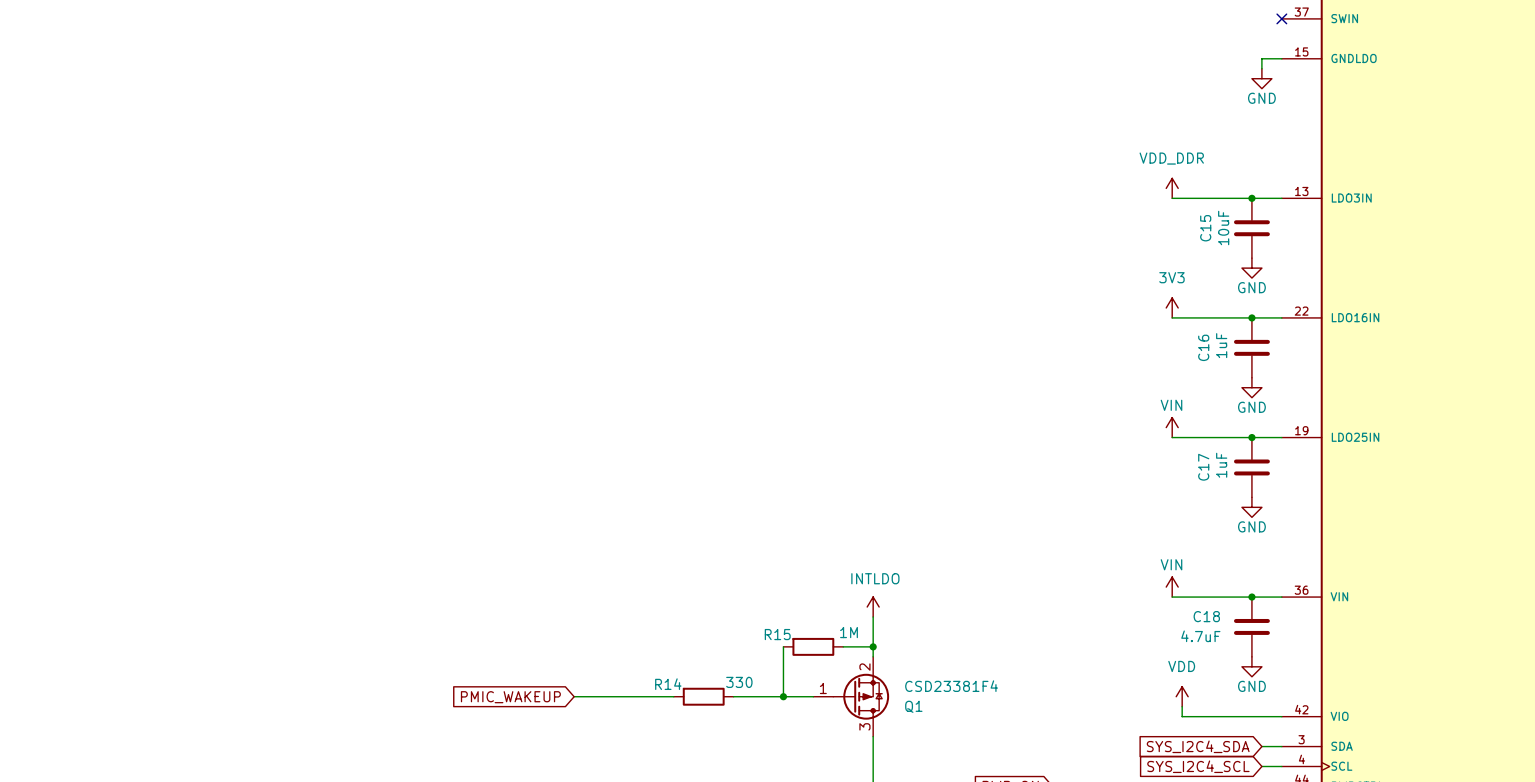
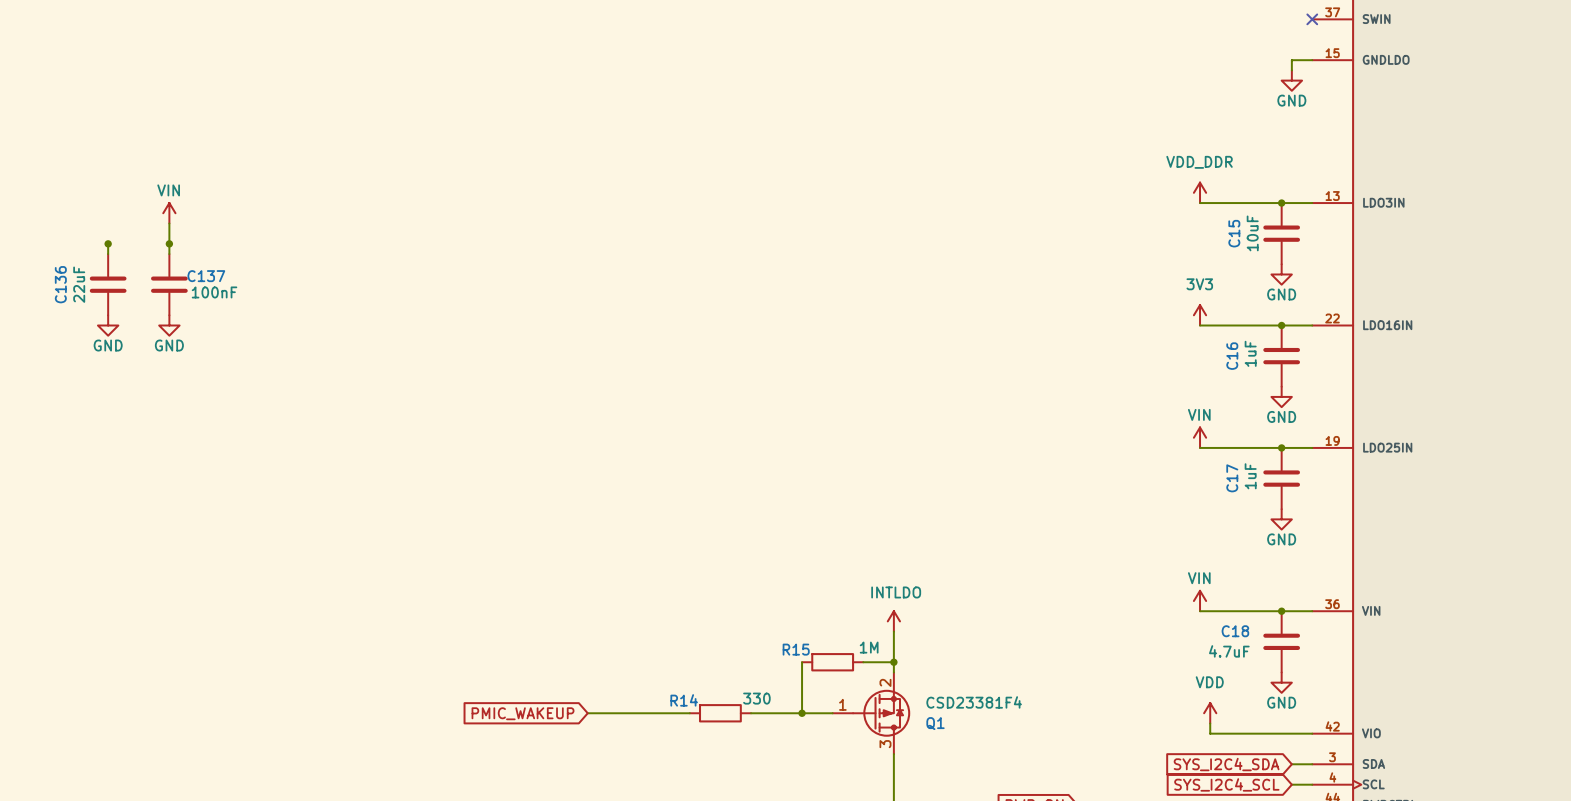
power symbol: none -> VIN (169, 213)
wire: none -> (169, 223) (169, 254)
wire: none -> (108, 243) (108, 254)
junction: none -> (108, 243)
junction: none -> (169, 243)
C136: none -> 22uF (108, 284)
C137: none -> 100nF (169, 284)
power symbol: none -> GND (108, 325)
power symbol: none -> GND (169, 325)

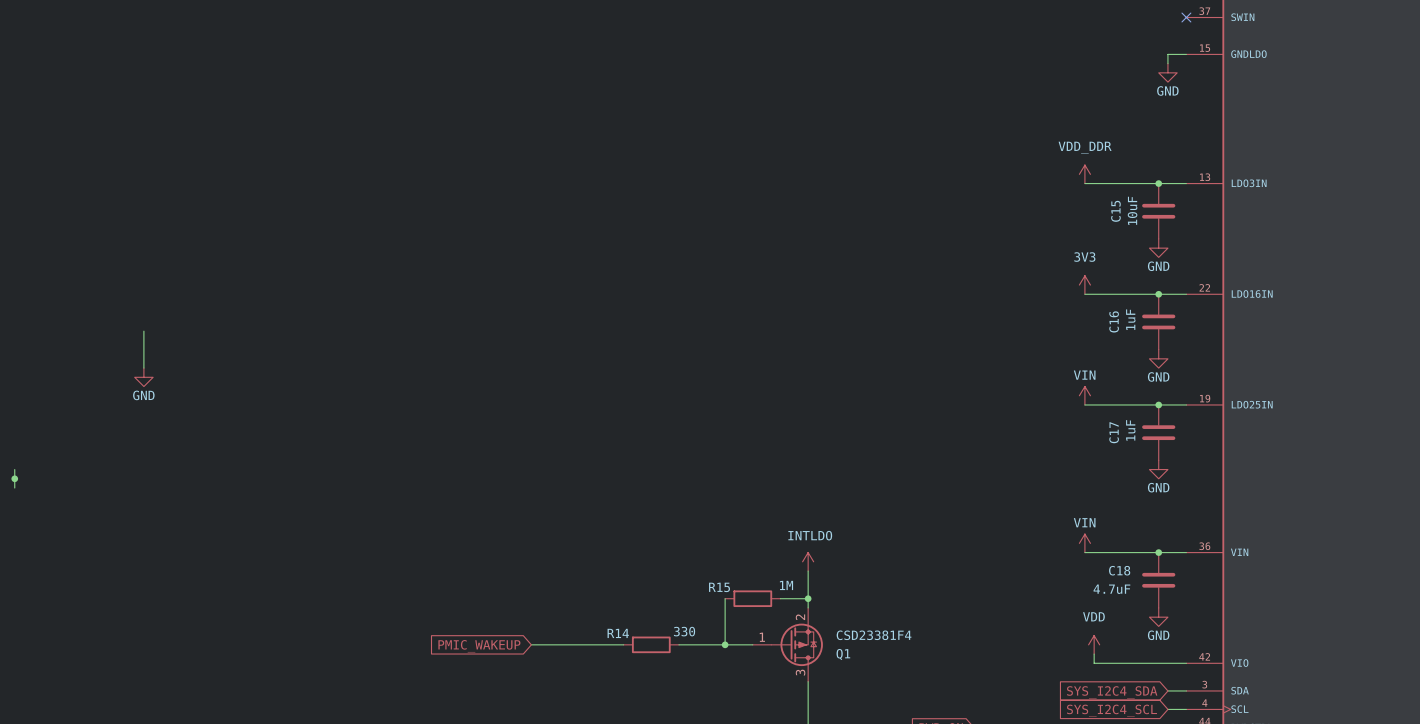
power symbol: VIN (169, 213) -> none
wire: (169, 223) (169, 254) -> none
wire: (108, 243) (108, 254) -> none
junction: (108, 243) -> none
junction: (169, 243) -> none
C136: 22uF (108, 284) -> none
C137: 100nF (169, 284) -> none
power symbol: GND (108, 325) -> none
power symbol: GND (169, 325) -> none
wire: none -> (143, 331) (143, 368)
power symbol: none -> GND (143, 377)
wire: none -> (14, 469) (14, 488)
junction: none -> (14, 478)

